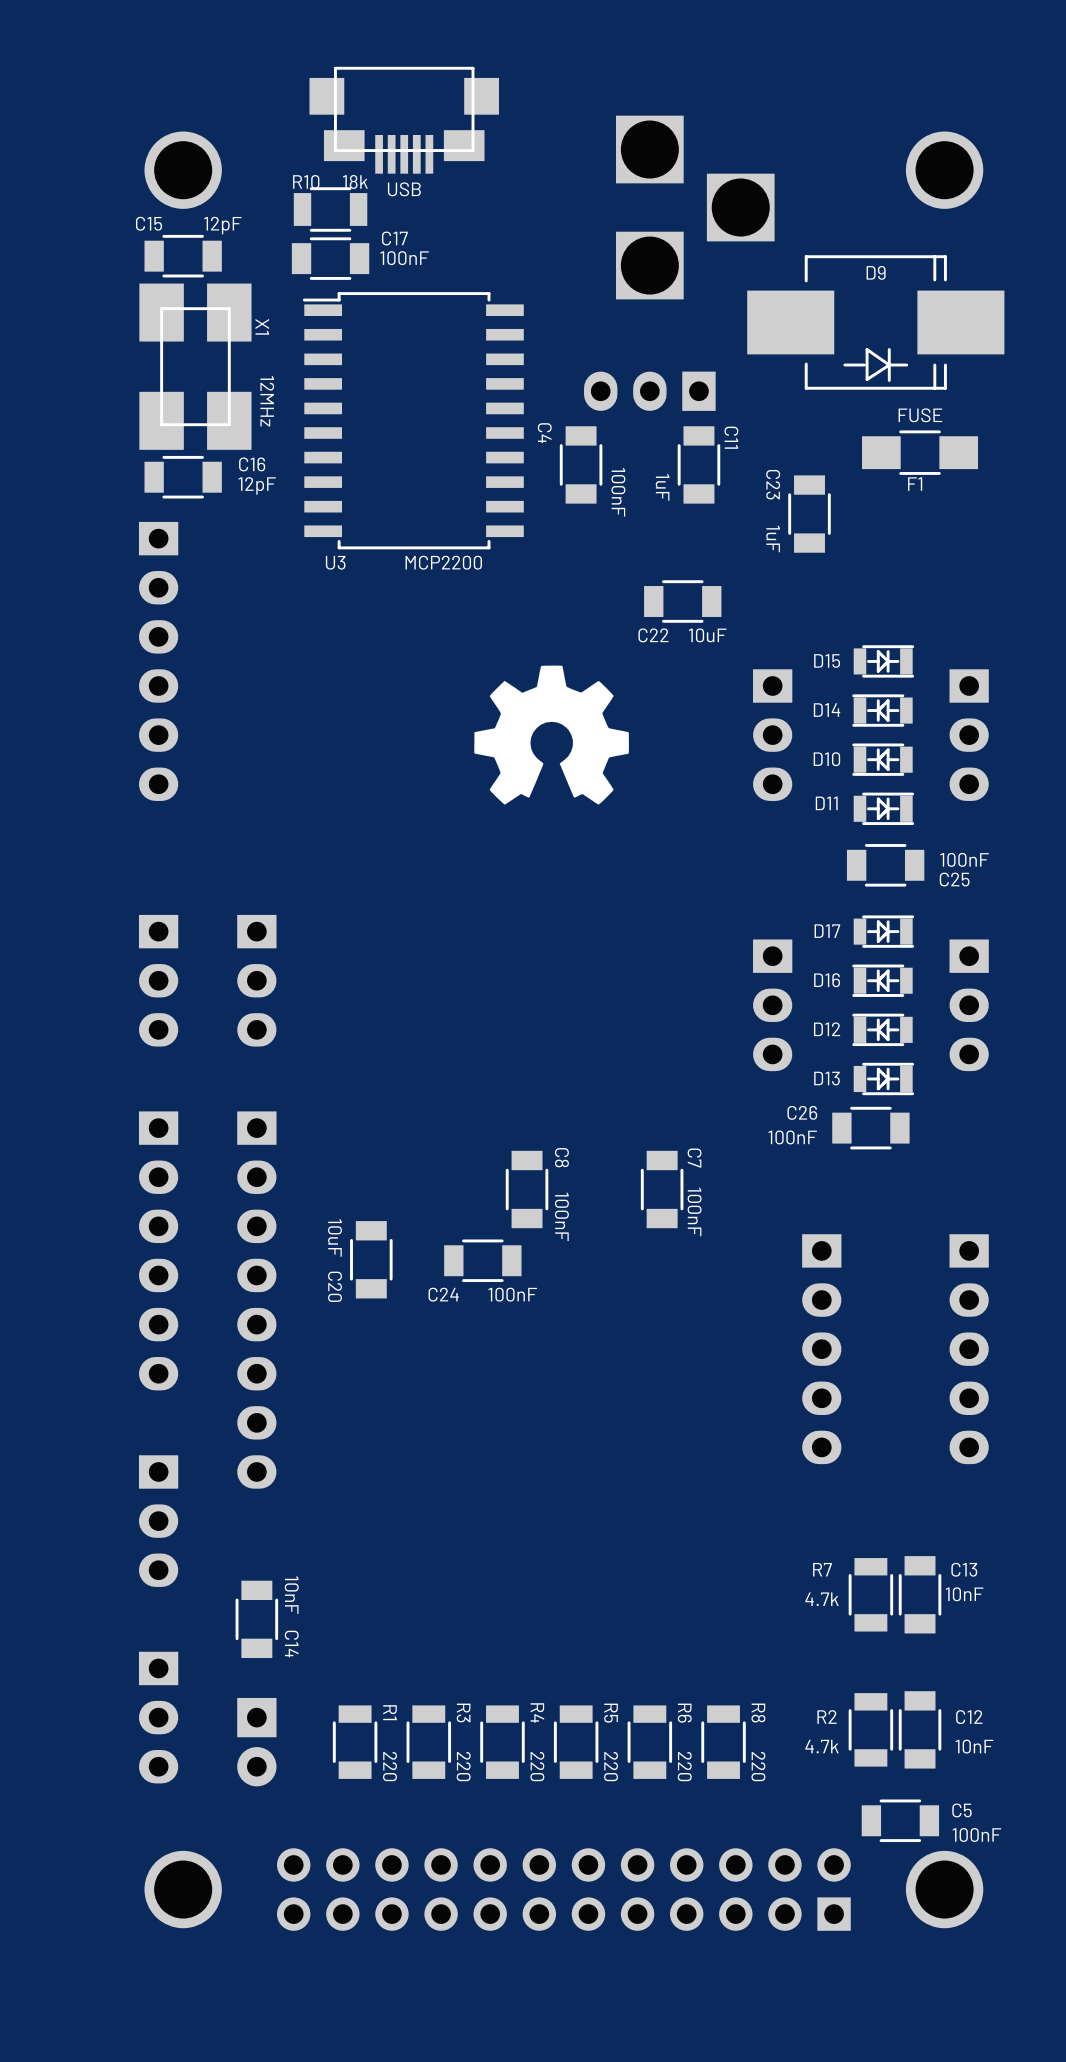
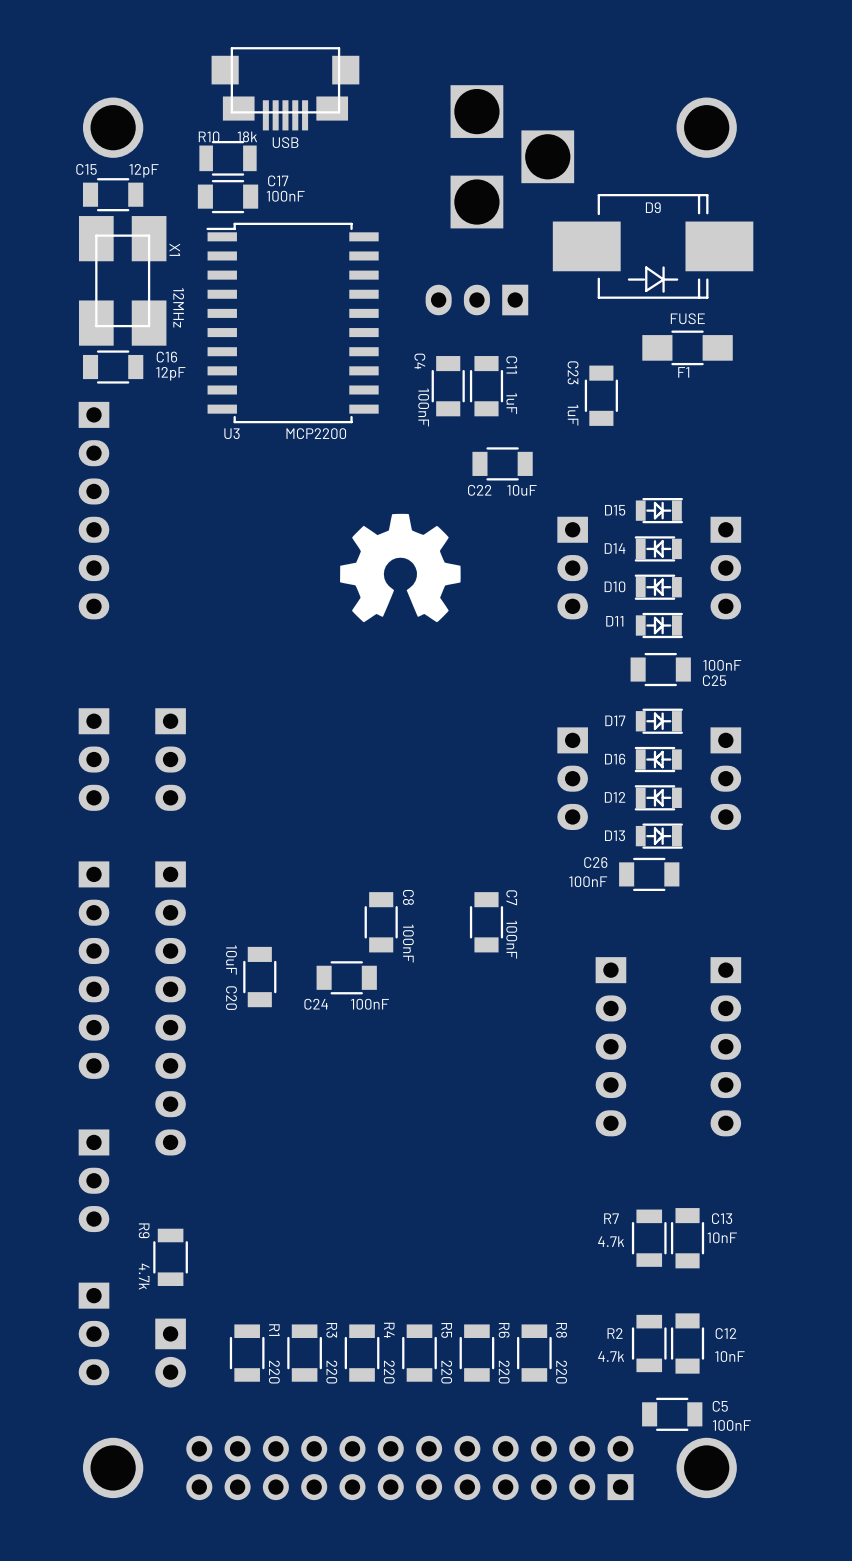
C4 position: (581, 464) -> (448, 386)
C11 position: (698, 464) -> (486, 386)
C14: 10nF (256, 1619) -> none
R9: none -> 4.7k (170, 1257)

